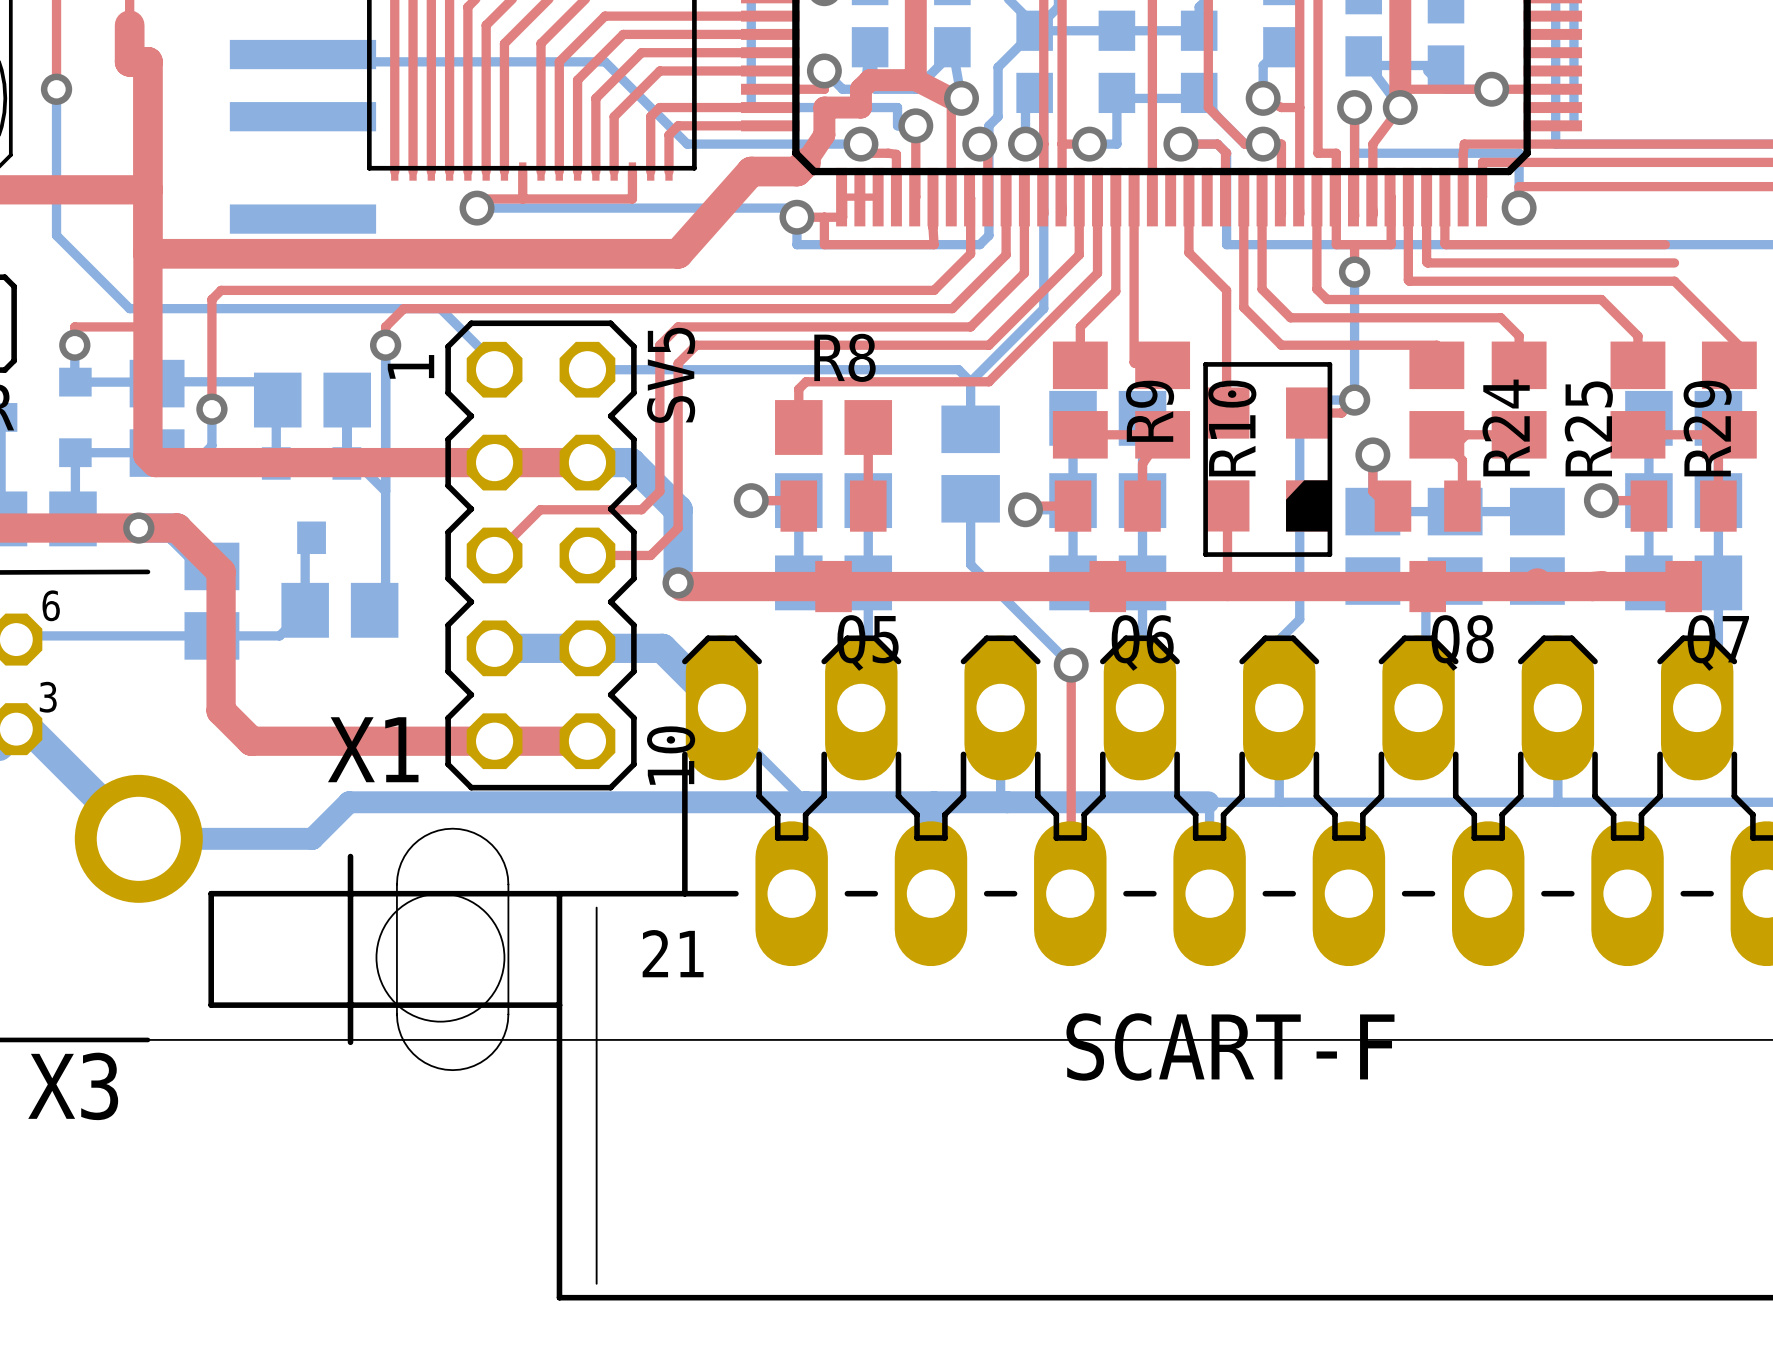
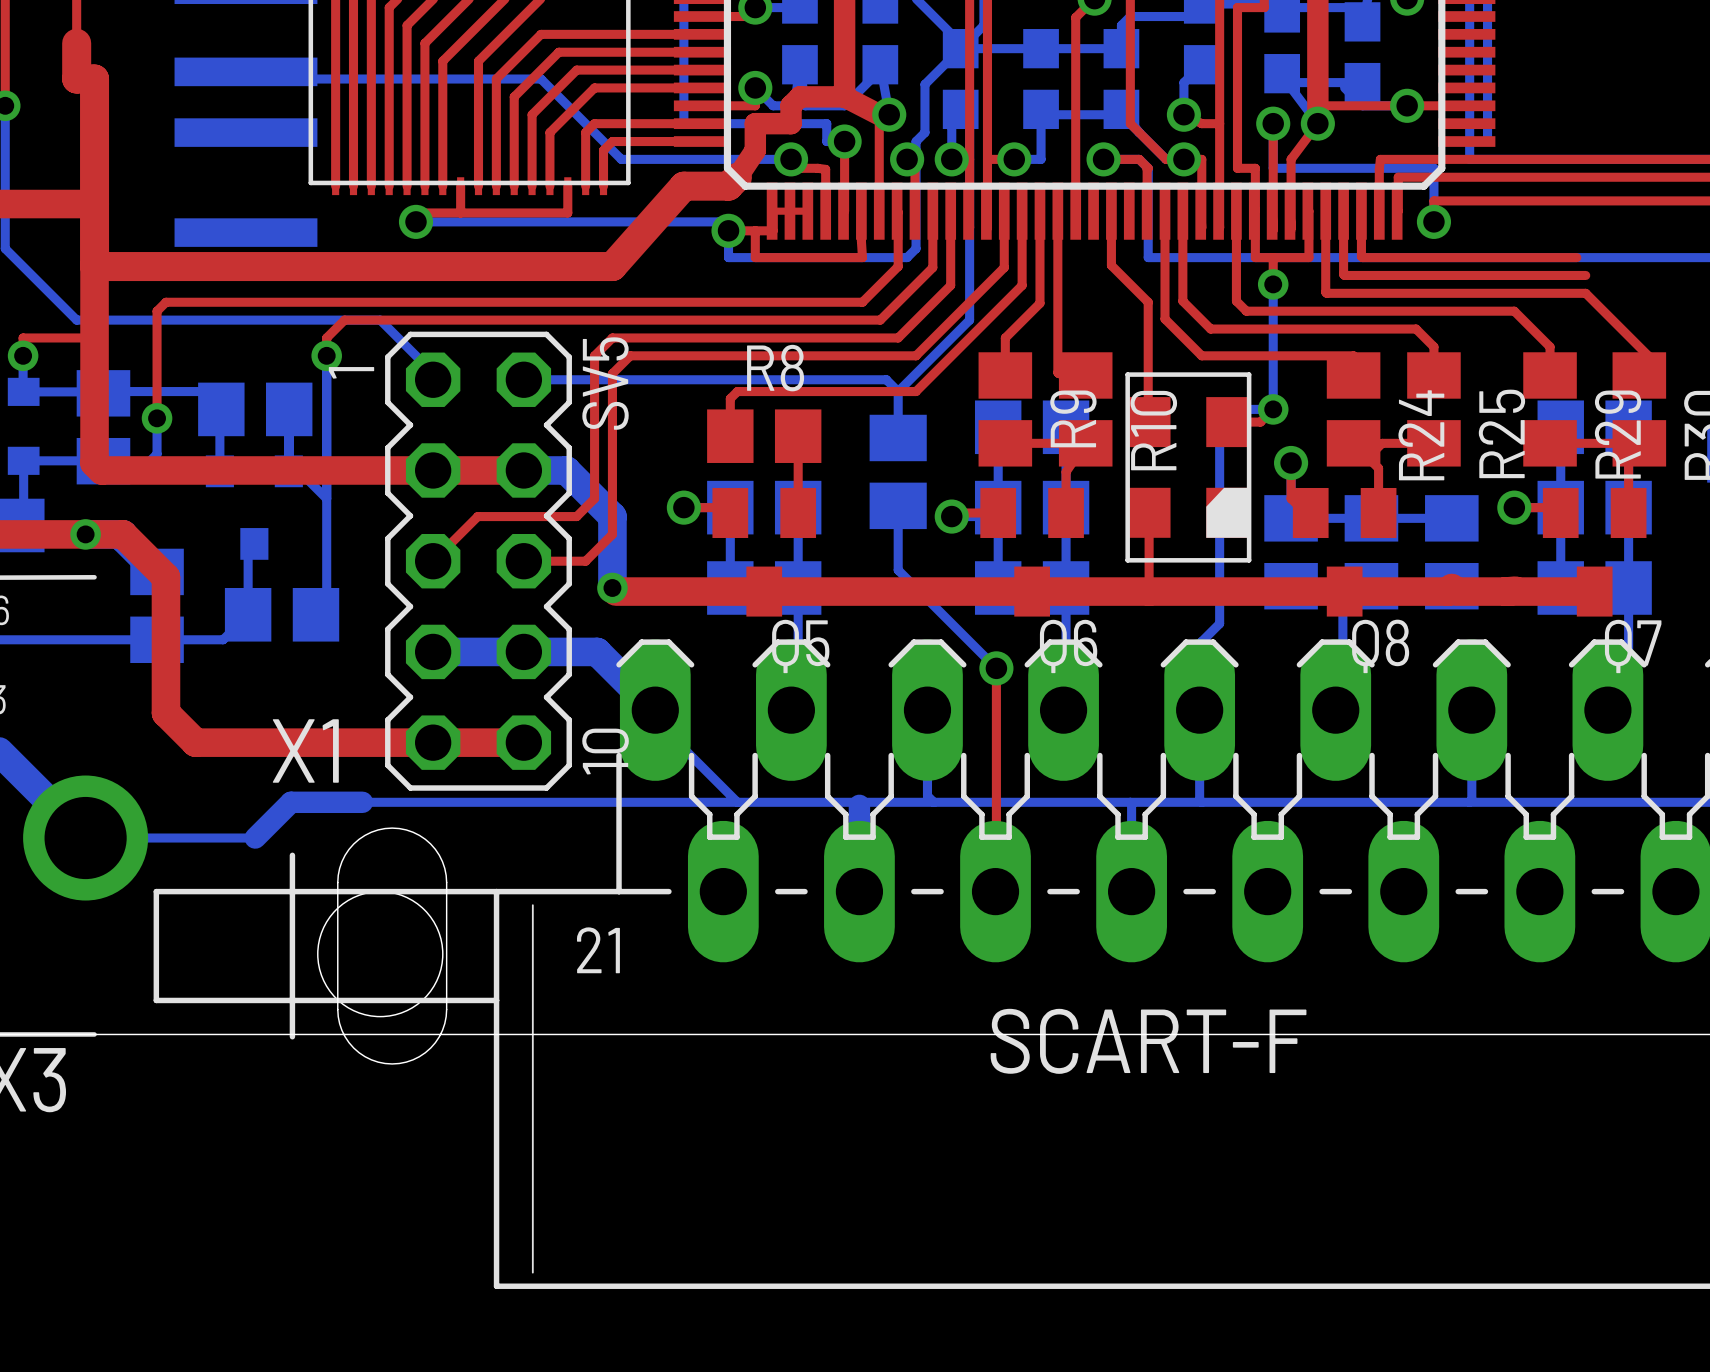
bottom track width: thick (422, 802) (1208, 802) -> thin (362, 802) (1130, 802)
bottom track width: thick (147, 838) (312, 838) -> thin (94, 838) (255, 838)

